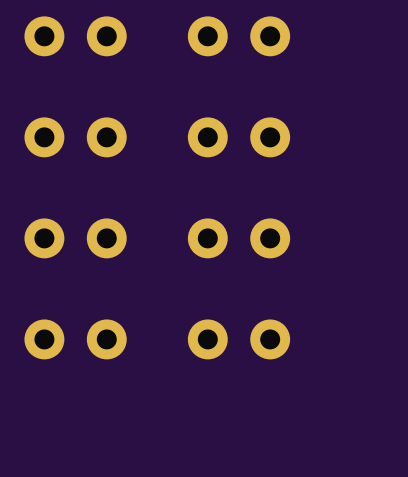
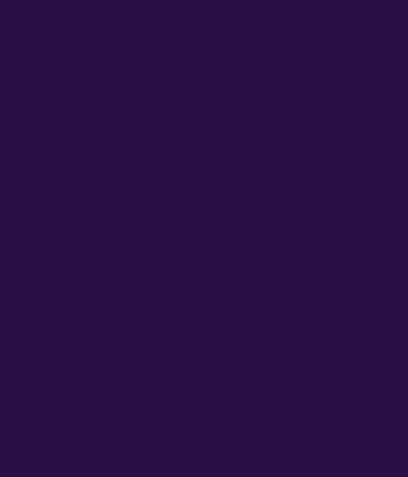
part: (75, 36) -> none
part: (238, 36) -> none
part: (75, 137) -> none
part: (238, 137) -> none
part: (75, 238) -> none
part: (238, 238) -> none
part: (75, 339) -> none
part: (238, 339) -> none

